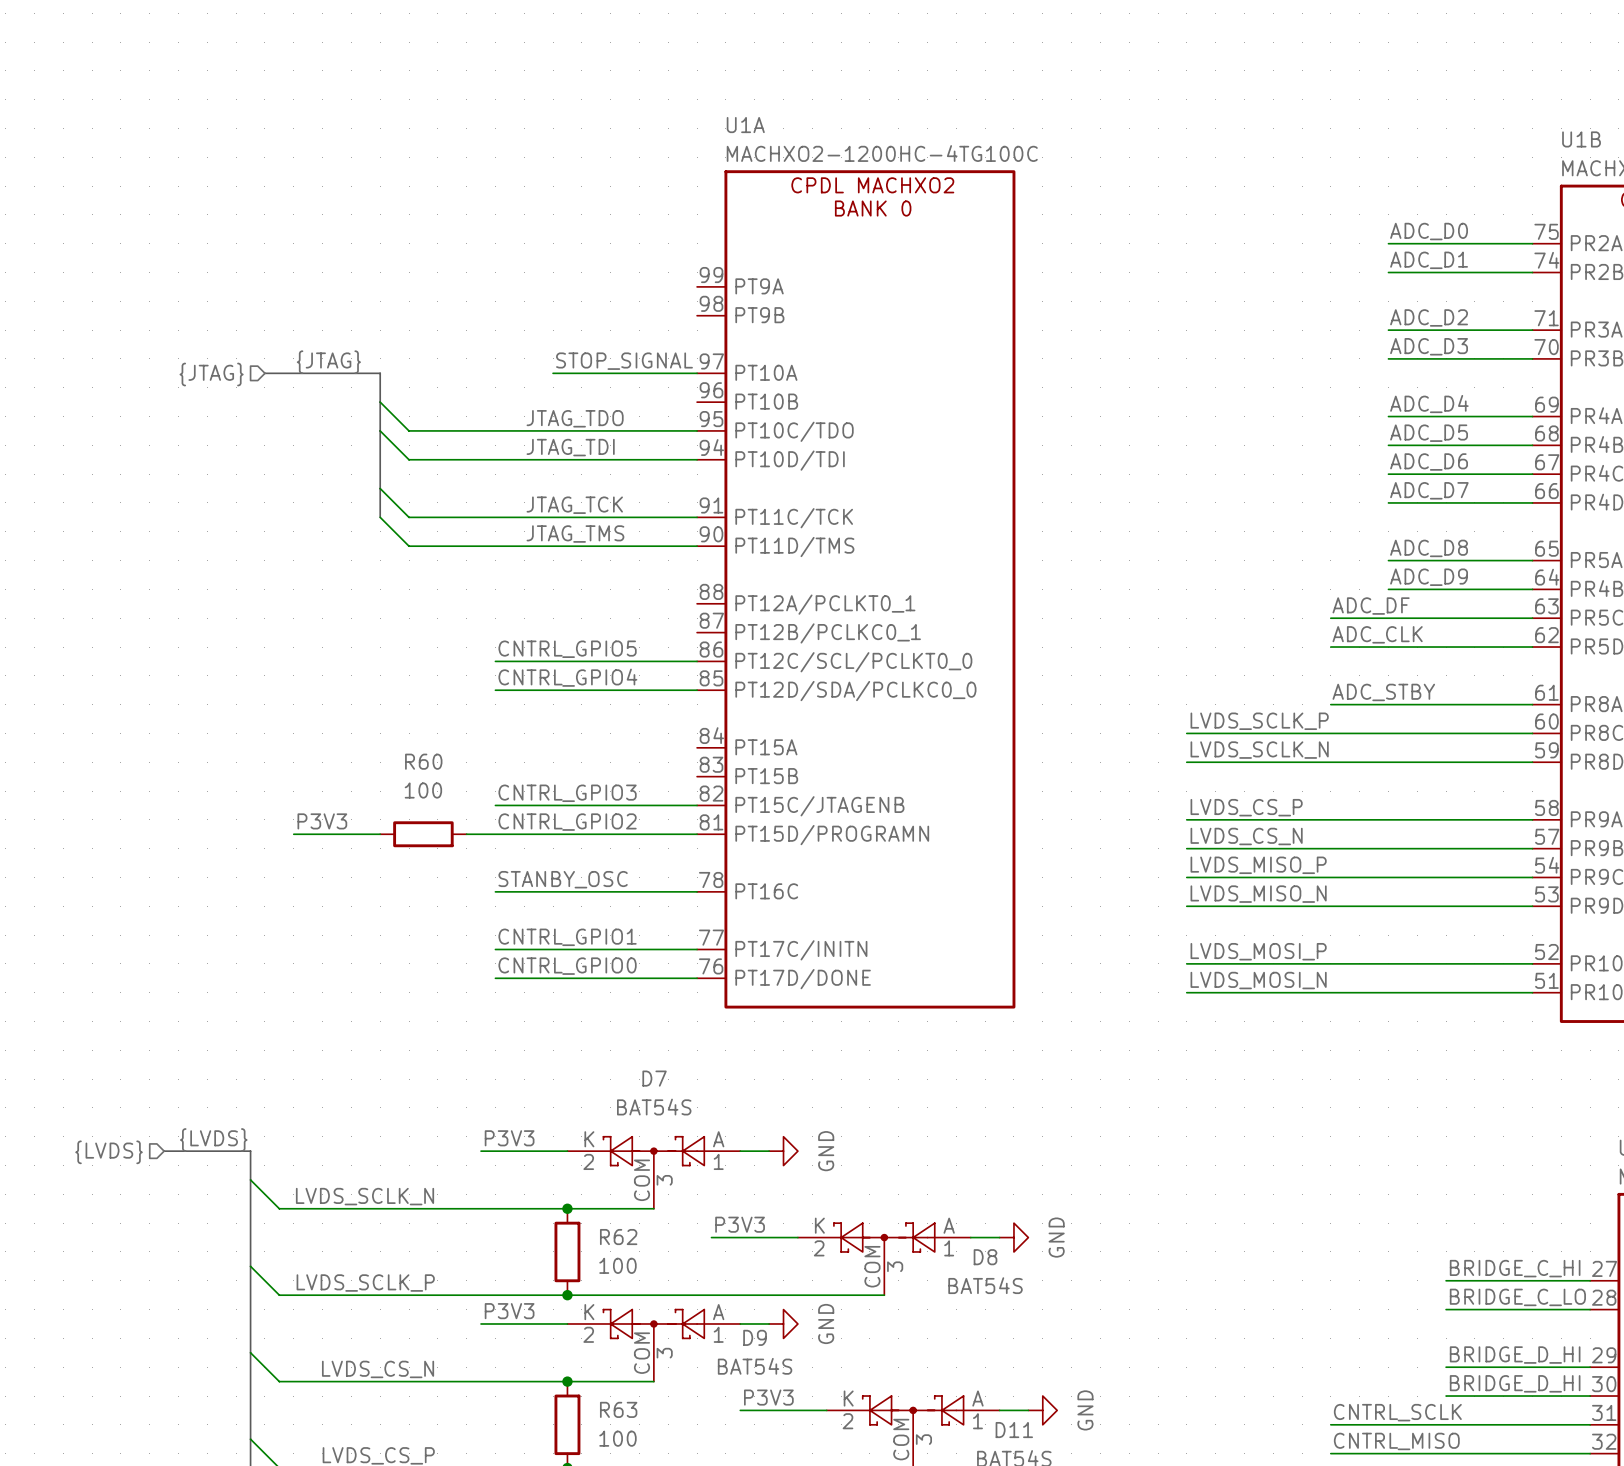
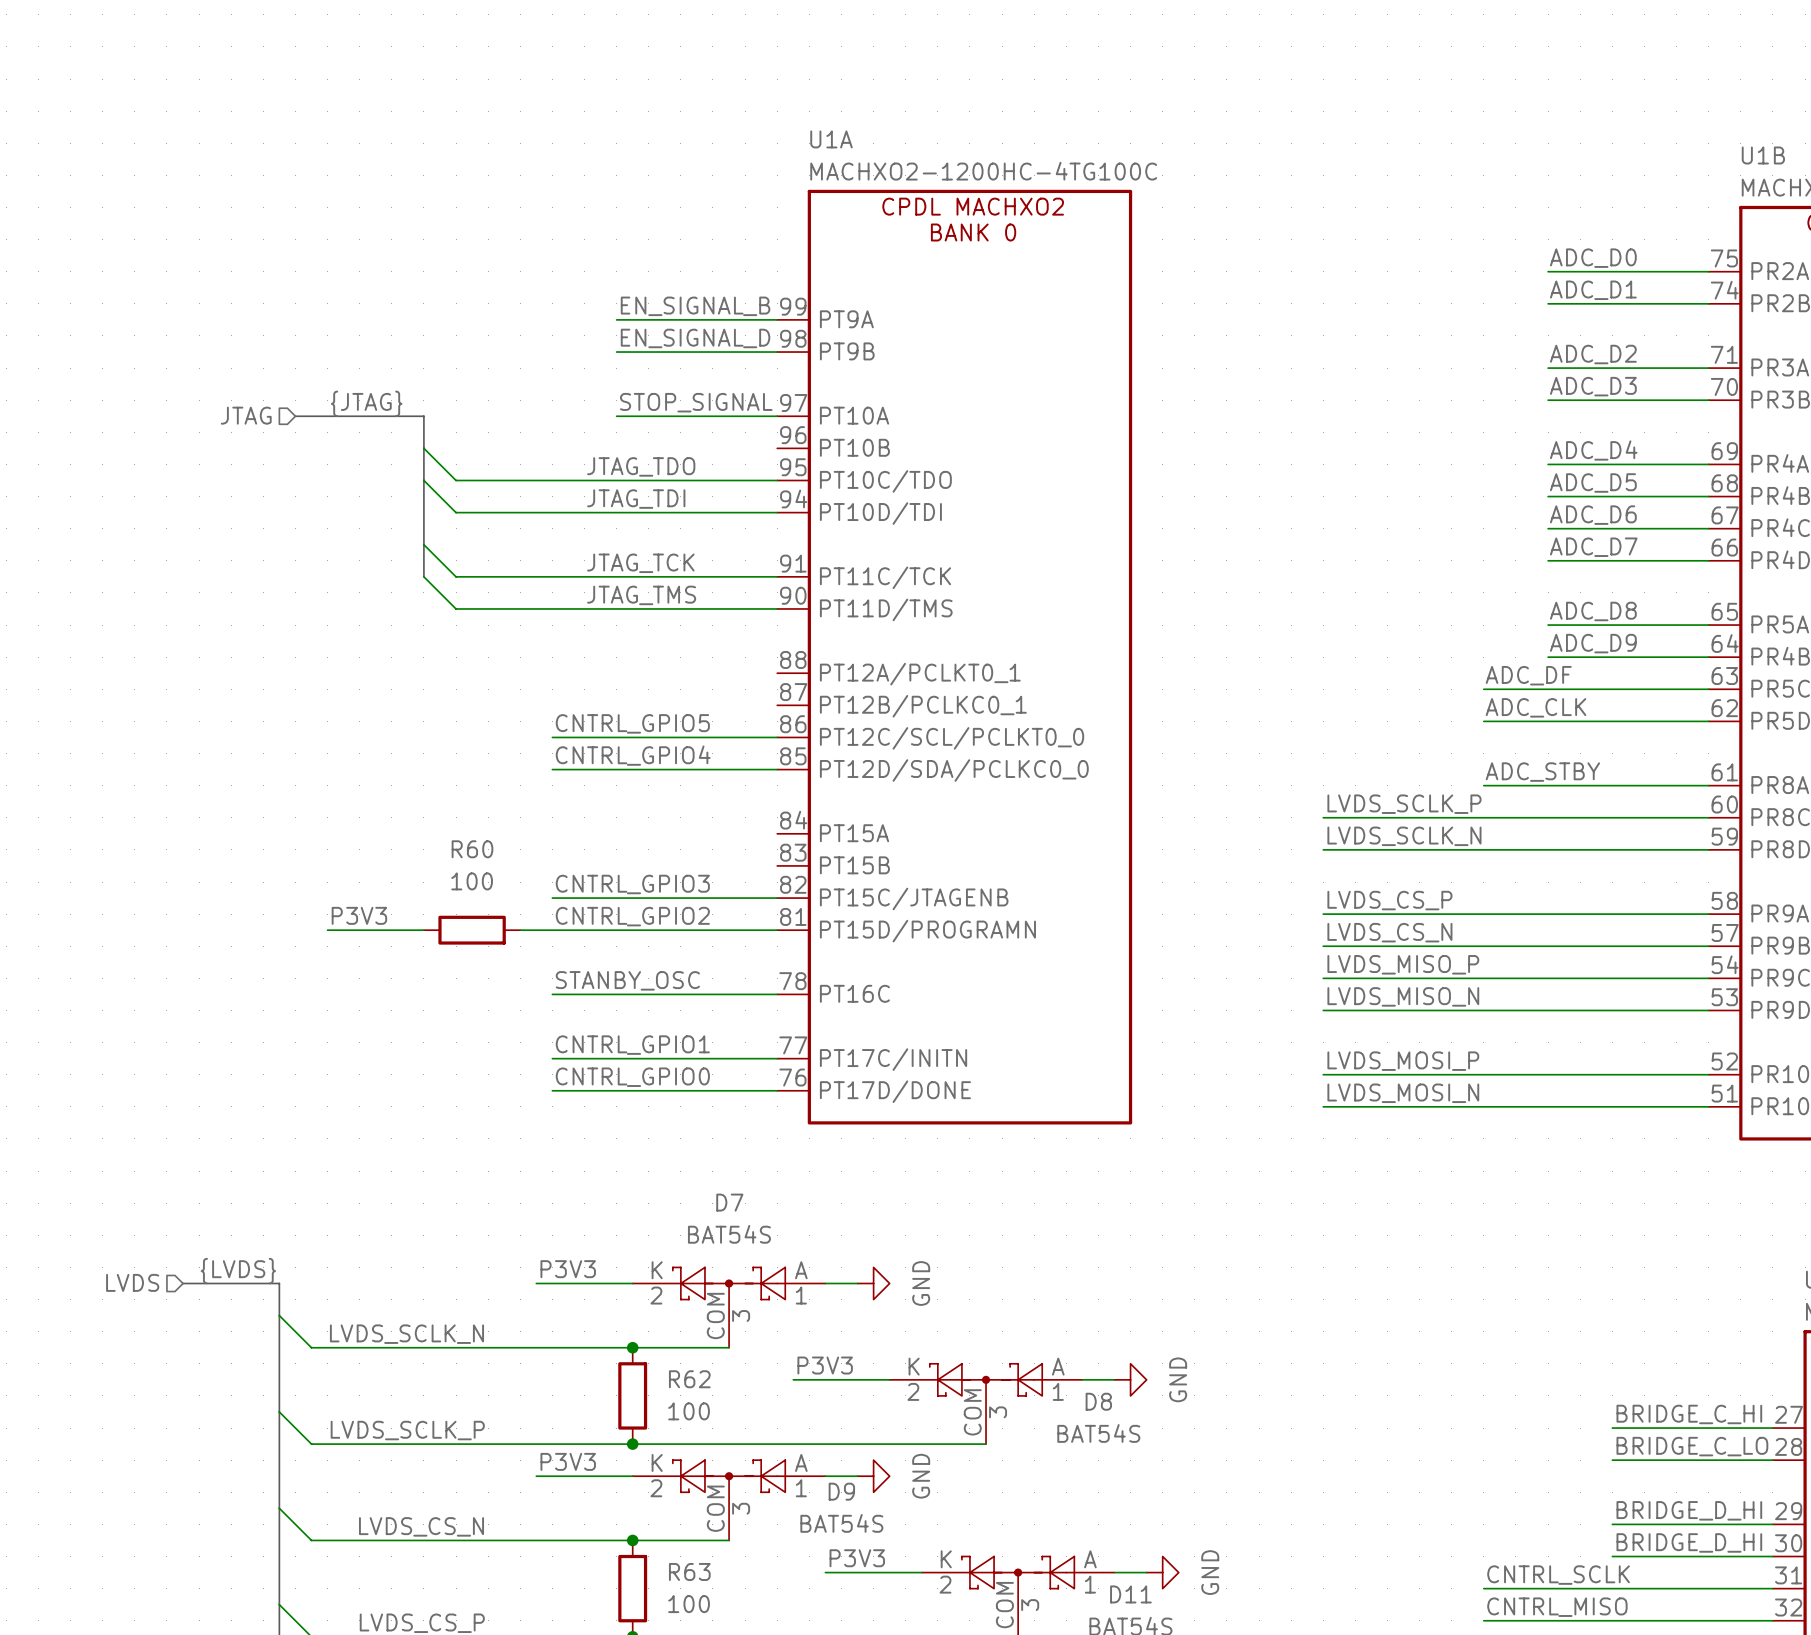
label: none -> EN_SIGNAL_B (695, 306)
wire: none -> (616, 319) (777, 319)
label: none -> EN_SIGNAL_D (695, 338)
wire: none -> (616, 352) (777, 352)
hierarchical label: {JTAG} (211, 374) -> JTAG (246, 415)
hierarchical label: {LVDS} (109, 1152) -> LVDS (132, 1282)

